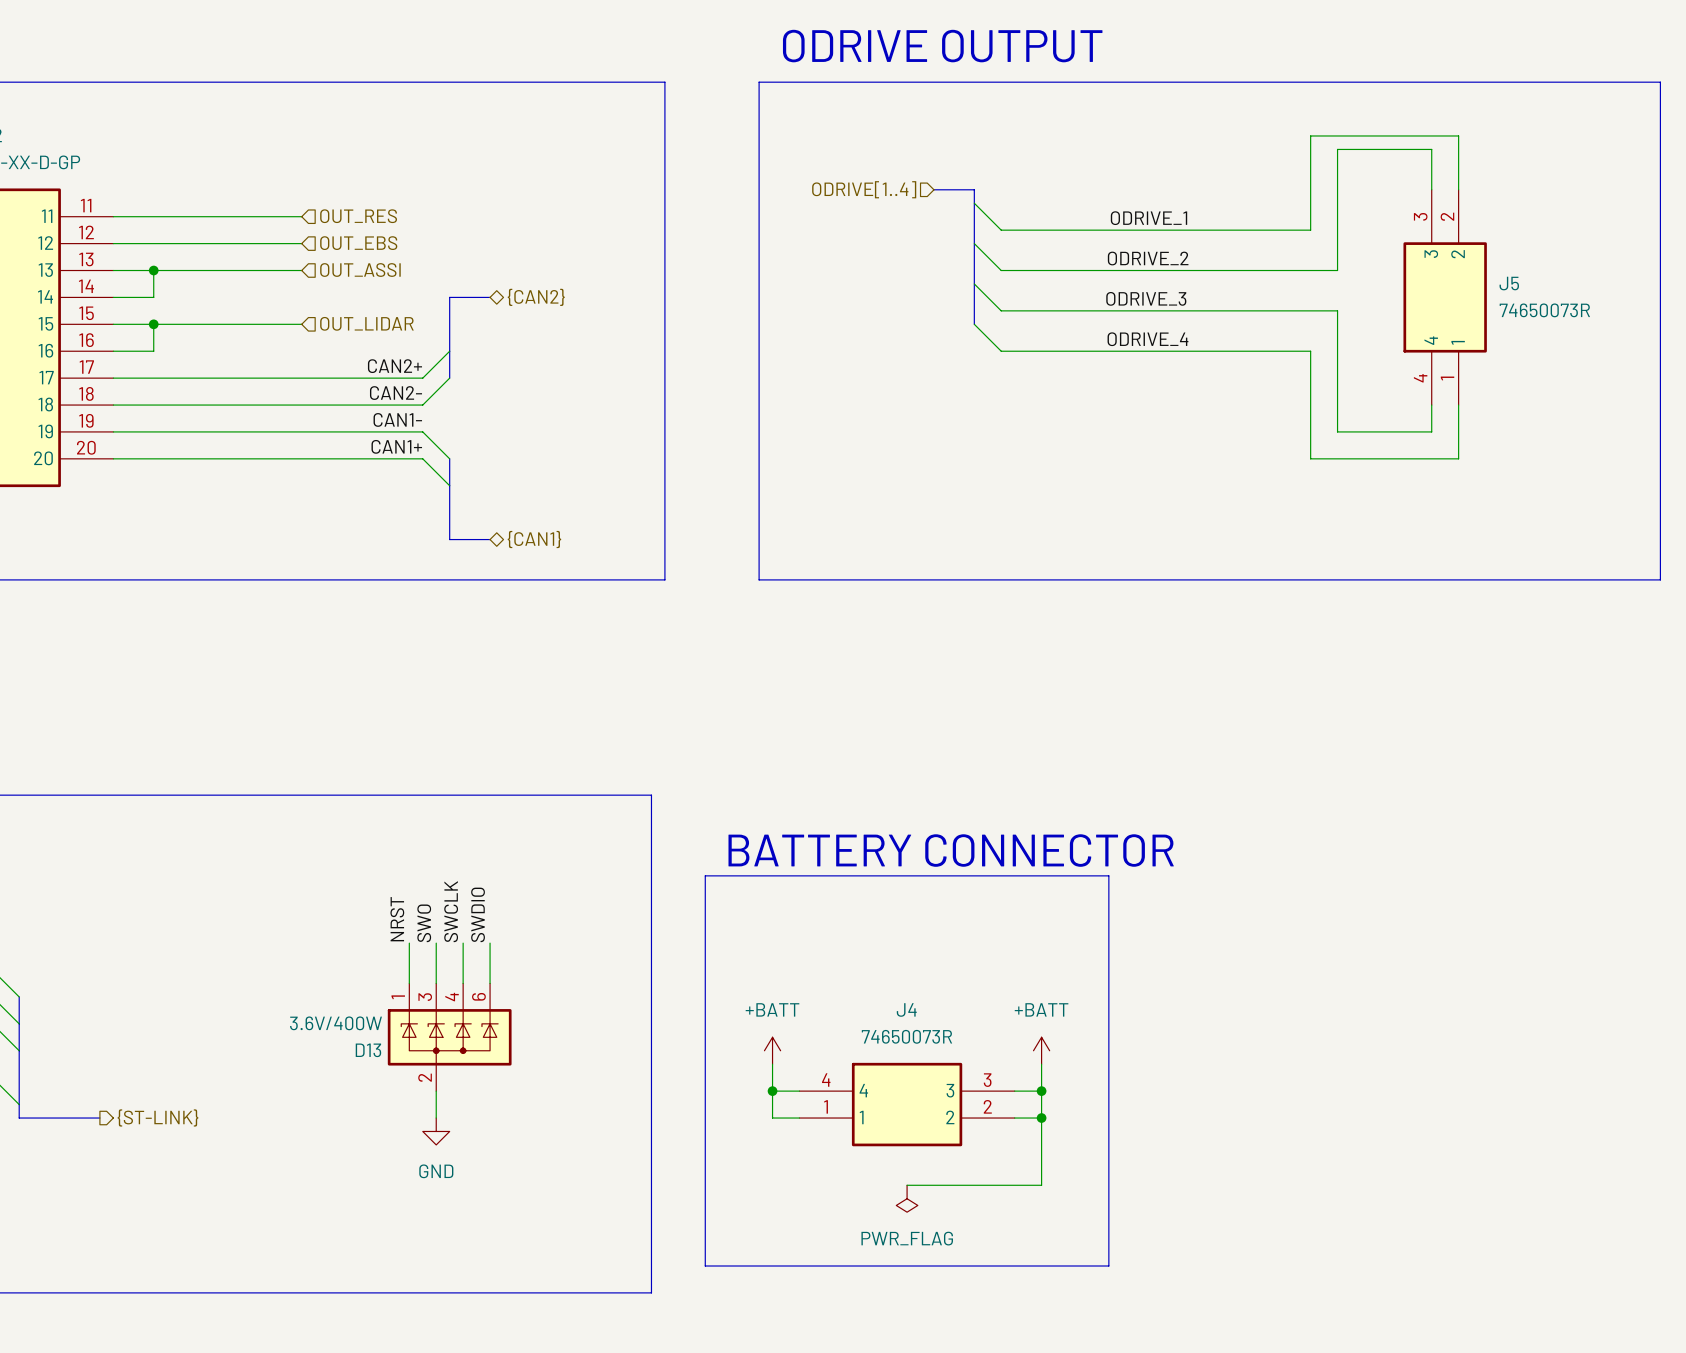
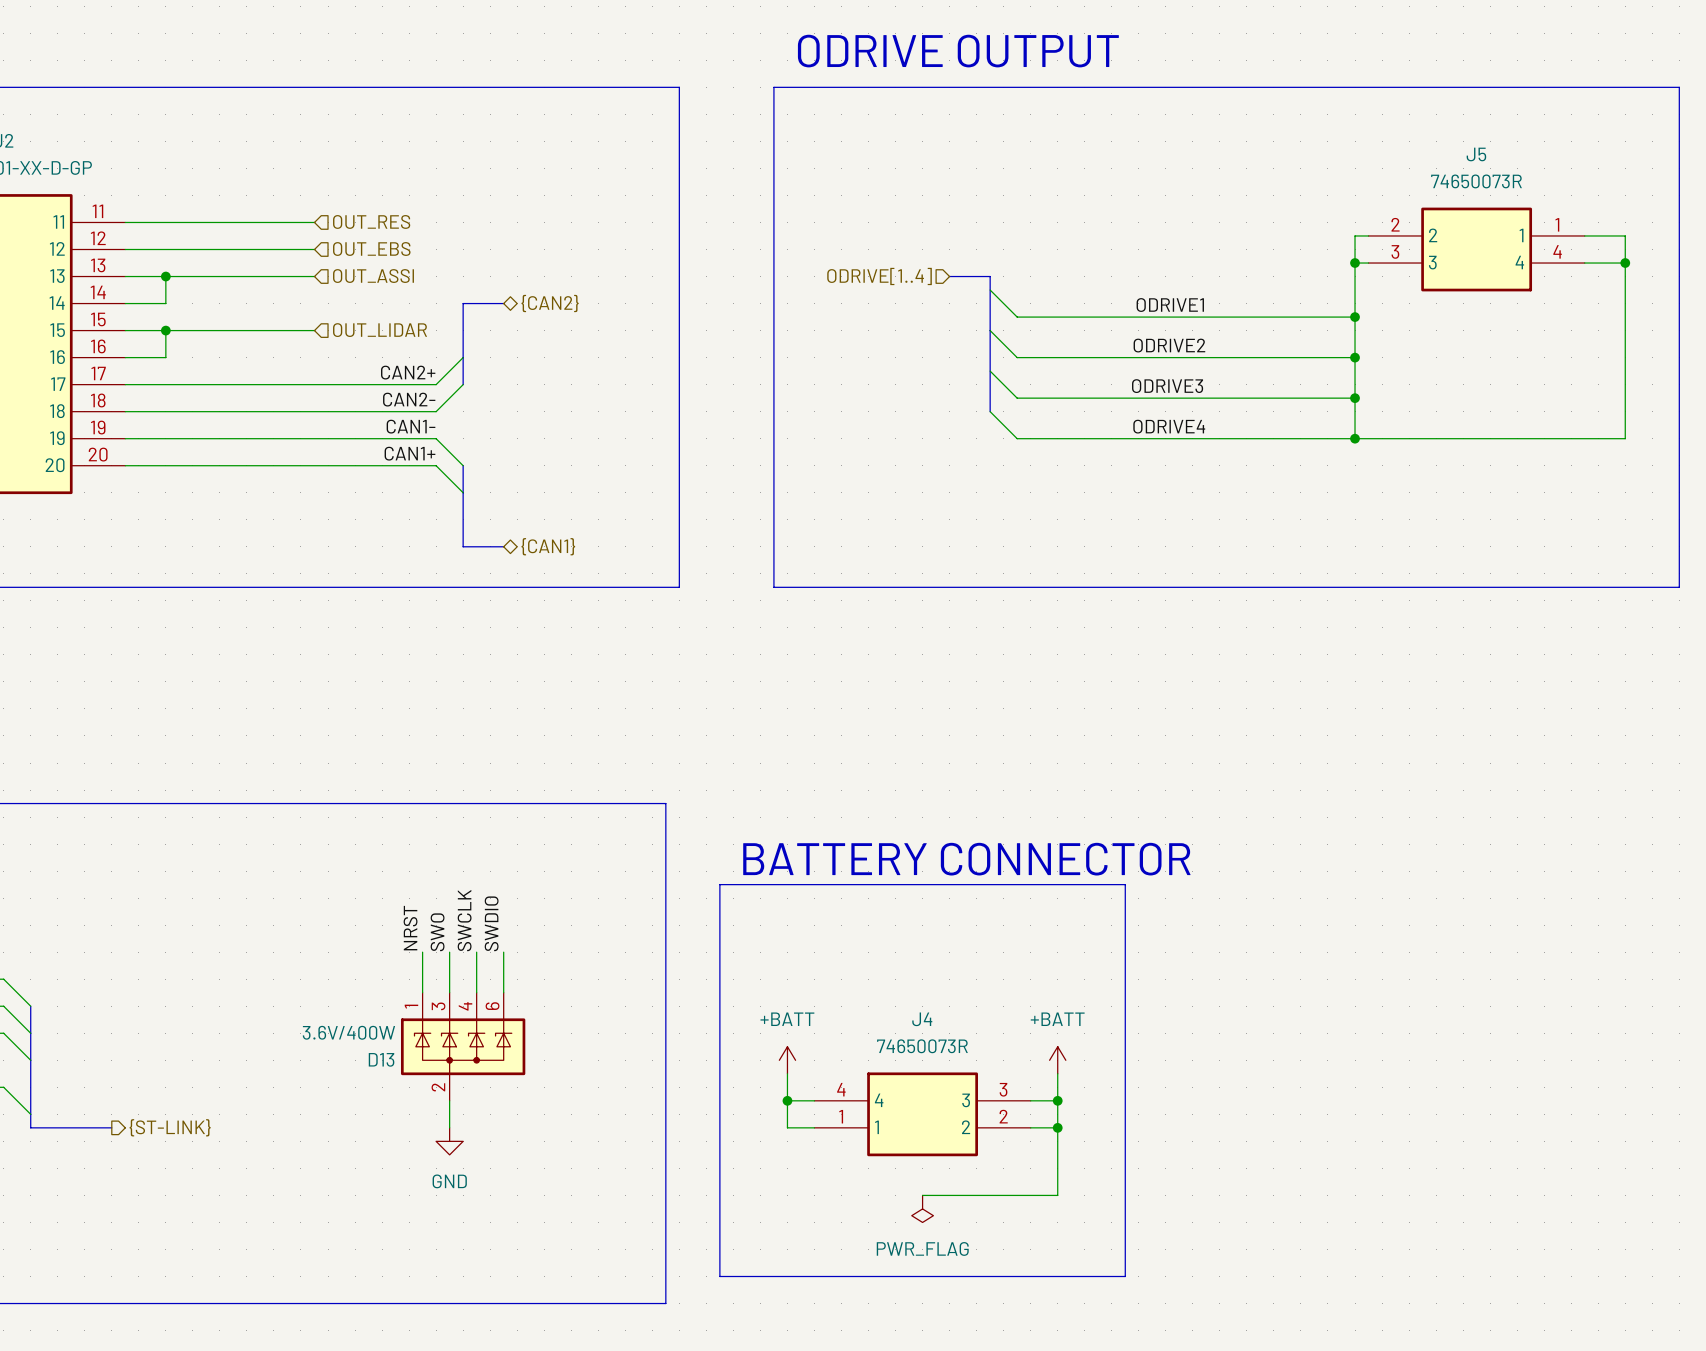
hierarchical label position: ODRIVE[1..4] (864, 189) -> ODRIVE[1..4] (879, 276)
bus: (933, 189) (974, 189) (974, 270) -> (949, 276) (990, 276)
wire: (1431, 189) (1431, 149) (1337, 149) (1337, 230) -> (1368, 235) (1355, 235)
wire: (1458, 189) (1458, 135) (1310, 135) (1310, 230) (1001, 230) (974, 203) -> none
label: ODRIVE_1 (1149, 218) -> none
wire: (974, 243) (1001, 270) (1337, 270) -> (1355, 317) (1355, 276)
wire: none -> (1355, 263) (1368, 263)
junction: none -> (1355, 263)
wire: none -> (1584, 263) (1625, 263)
junction: none -> (1625, 263)
label: ODRIVE_2 (1148, 258) -> none
J5 name position: J5 (1509, 283) -> J5 (1476, 154)
J5 rotation: 0° (1445, 297) -> 90° counterclockwise (1476, 249)
label: ODRIVE_3 (1146, 298) -> ODRIVE1 (1170, 305)
junction: none -> (1355, 317)
J5 value position: 74650073R (1544, 310) -> 74650073R (1476, 181)
bus: none -> (990, 330) (990, 411)
label: ODRIVE_4 (1147, 339) -> ODRIVE2 (1169, 345)
wire: (1310, 351) (1310, 458) (1458, 458) (1458, 405) -> (1327, 357) (1355, 357)
junction: none -> (1355, 357)
wire: none -> (990, 371) (1017, 398) (1355, 398)
label: none -> ODRIVE3 (1167, 386)
junction: none -> (1355, 398)
wire: none -> (990, 411) (1017, 438) (1355, 438)
wire: (1431, 405) (1431, 431) -> (1584, 235) (1625, 235) (1625, 438) (1449, 438)
label: none -> ODRIVE4 (1169, 426)
junction: none -> (1355, 438)

